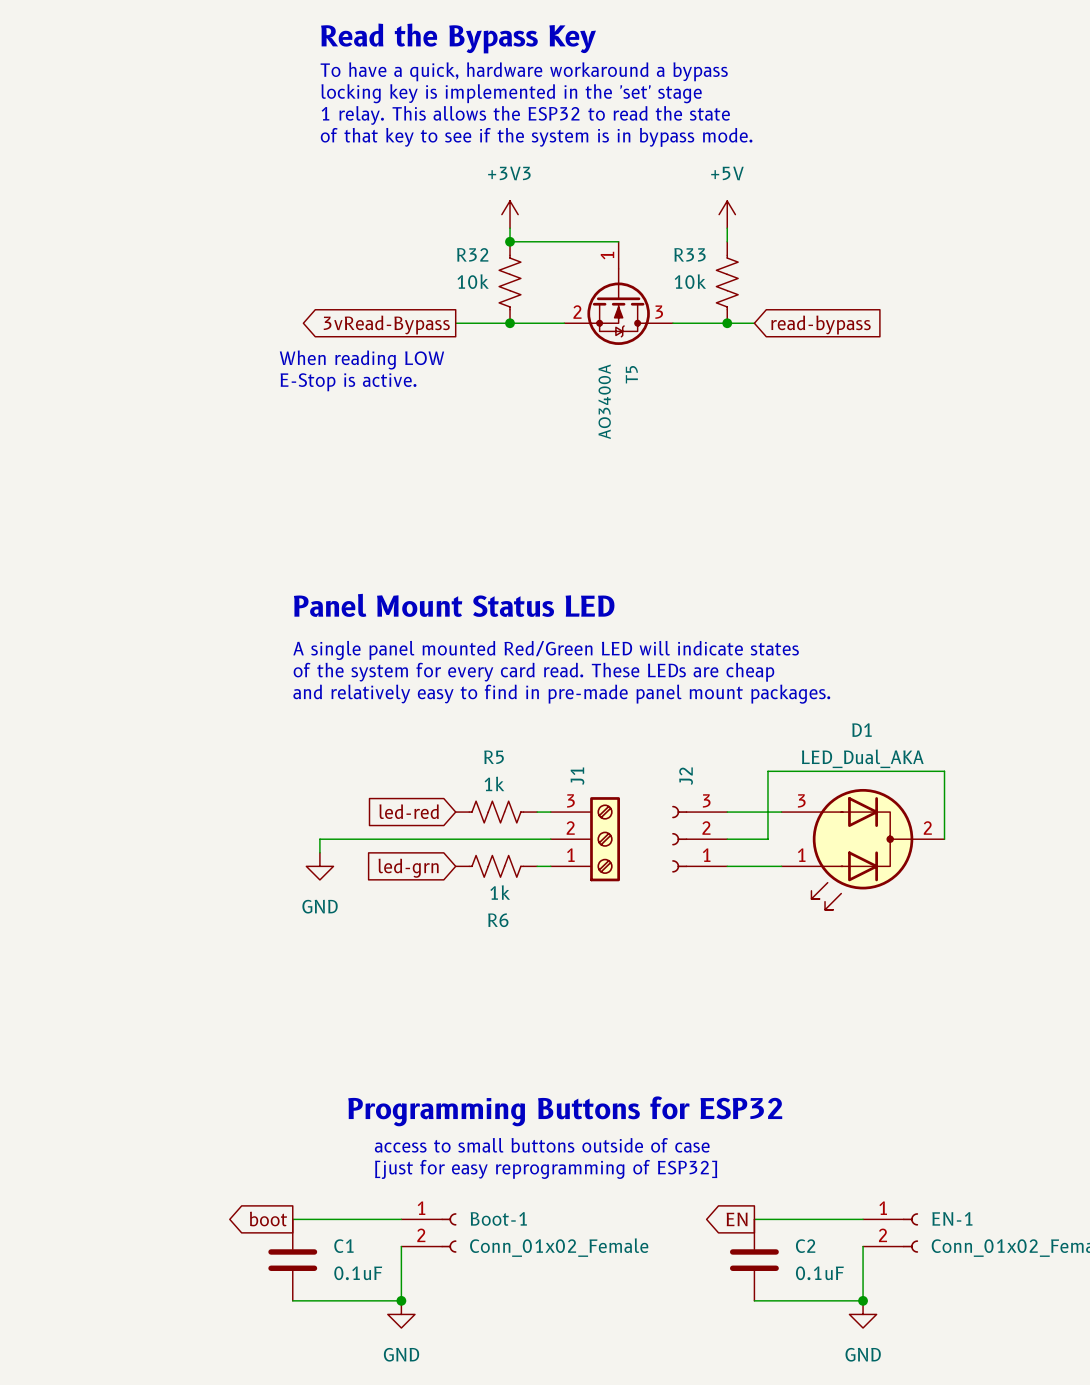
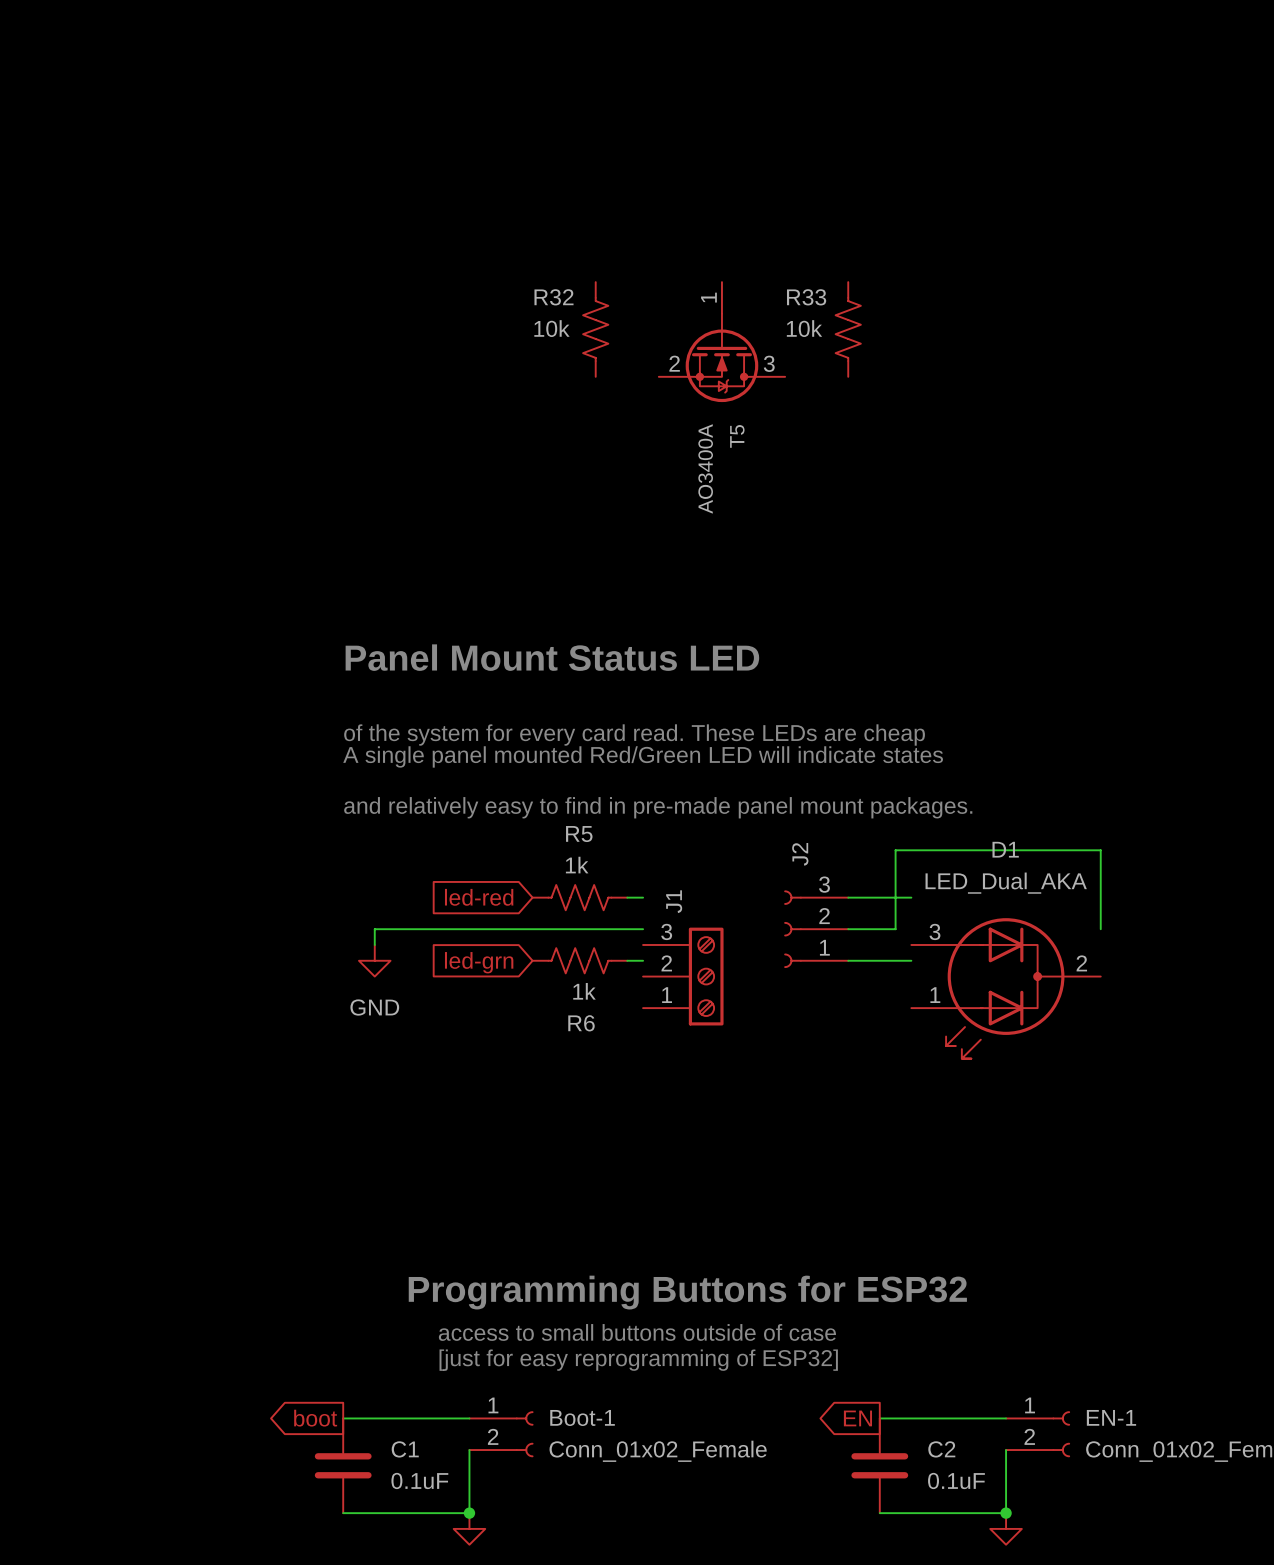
text: Read the Bypass Key (458, 38) -> none
text: To have a quick, hardware workaround a bypass (524, 71) -> none
text: locking key is implemented in the 'set' stage (511, 93) -> none
text: 1 relay. This allows the ESP32 to read the state (525, 115) -> none
text: of that key to see if the system is in bypass mode. (536, 137) -> none
power symbol: +3V3 (510, 214) -> none
power symbol: +5V (727, 214) -> none
wire: (510, 228) (510, 241) (618, 241) -> none
wire: (727, 228) (727, 241) -> none
junction: (510, 241) -> none
wire: (455, 323) (564, 323) -> none
junction: (510, 323) -> none
wire: (672, 323) (754, 323) -> none
junction: (727, 323) -> none
global label: 3vRead-Bypass (386, 325) -> none
global label: read-bypass (821, 325) -> none
text: When reading LOW (361, 360) -> none
text: E-Stop is active. (348, 382) -> none
text position: Panel Mount Status LED (454, 605) -> Panel Mount Status LED (552, 657)
text position: of the system for every card read. These LEDs are cheap (533, 672) -> of the system for every card read. These LEDs are cheap (634, 735)
wire: (781, 771) (944, 771) -> (848, 897) (895, 897) (895, 850) (1100, 850) (1100, 897)
wire: (767, 798) (767, 839) (727, 839) -> (895, 929) (848, 929)
wire: (944, 798) (944, 839) -> none
global label position: led-red (409, 811) -> led-red (479, 897)
R5 position: (496, 812) -> (579, 897)
wire: (537, 812) (550, 812) -> (627, 897) (643, 897)
wire: (727, 812) (781, 812) -> none
wire: (550, 839) (319, 839) (319, 852) -> (643, 929) (374, 929) (374, 944)
J2 position: (699, 839) -> (816, 929)
power symbol position: GND (319, 866) -> GND (374, 960)
R6 position: (496, 866) -> (579, 960)
wire: (537, 866) (550, 866) -> (627, 960) (643, 960)
wire: (727, 866) (781, 866) -> (848, 960) (911, 960)
global label position: led-grn (408, 868) -> led-grn (479, 962)

